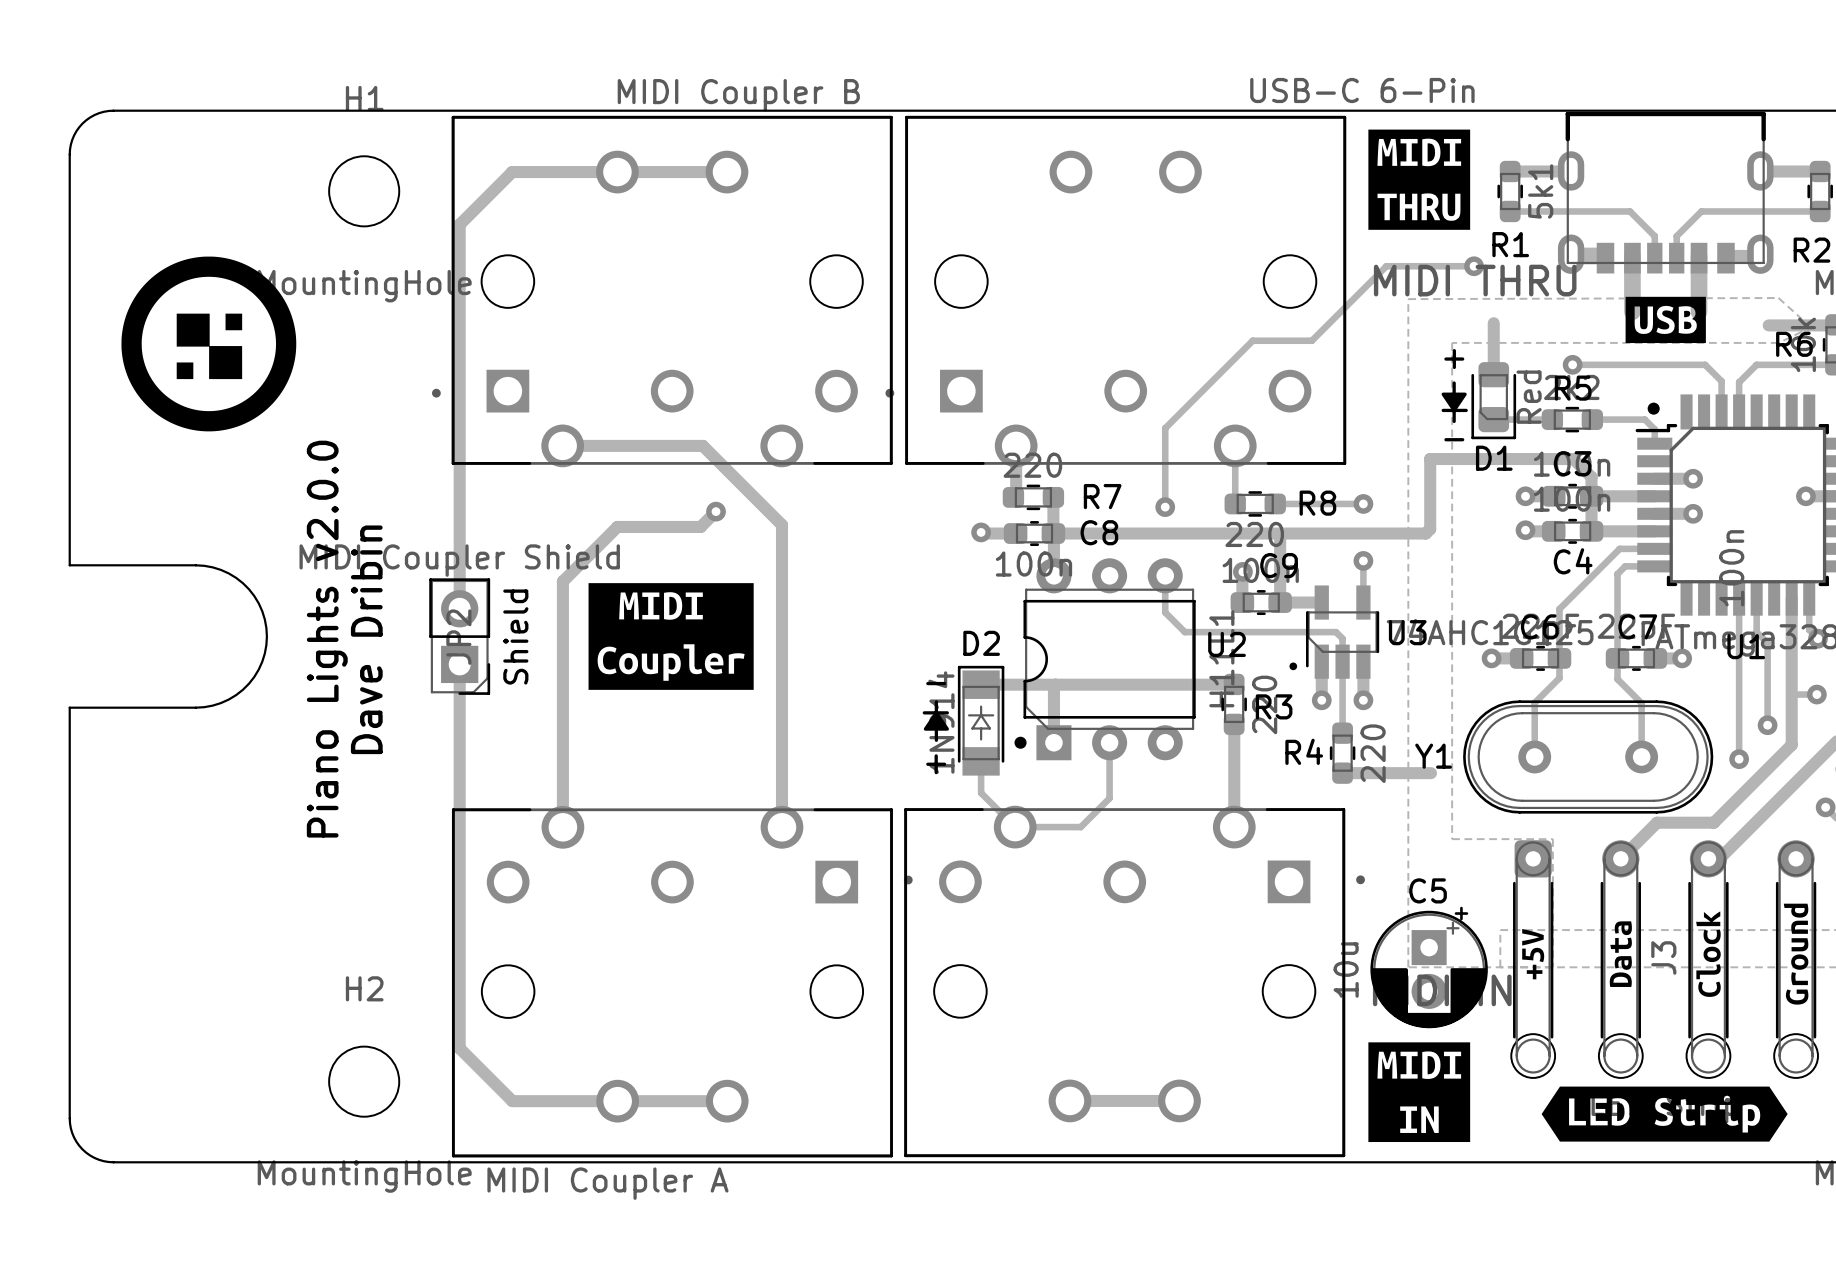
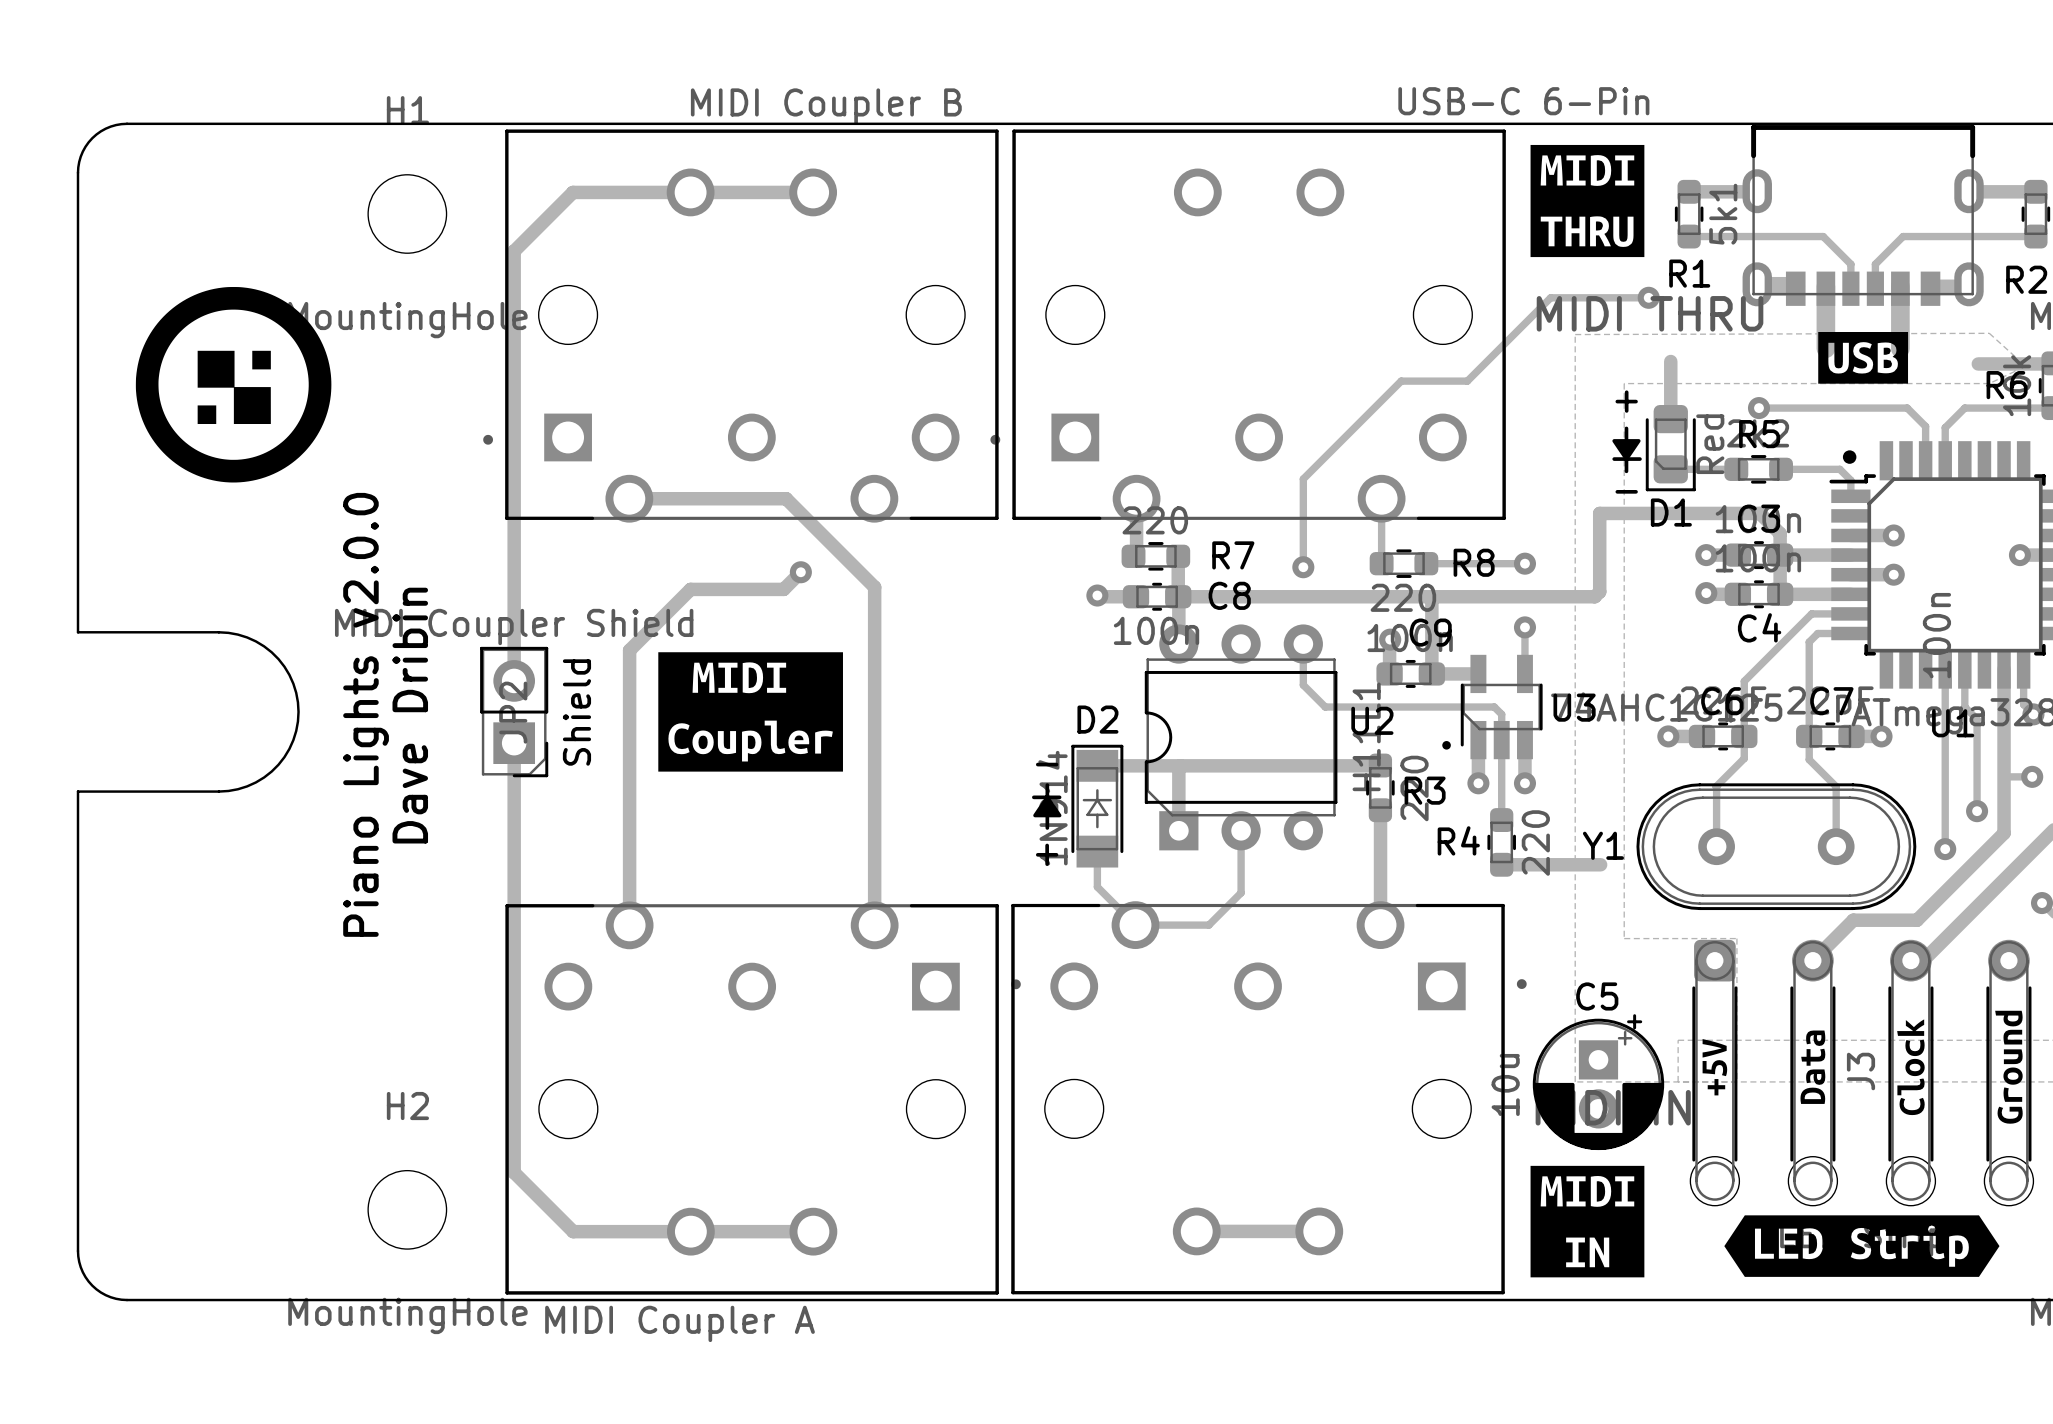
drawing: [1014, 736, 1027, 749] -> none

